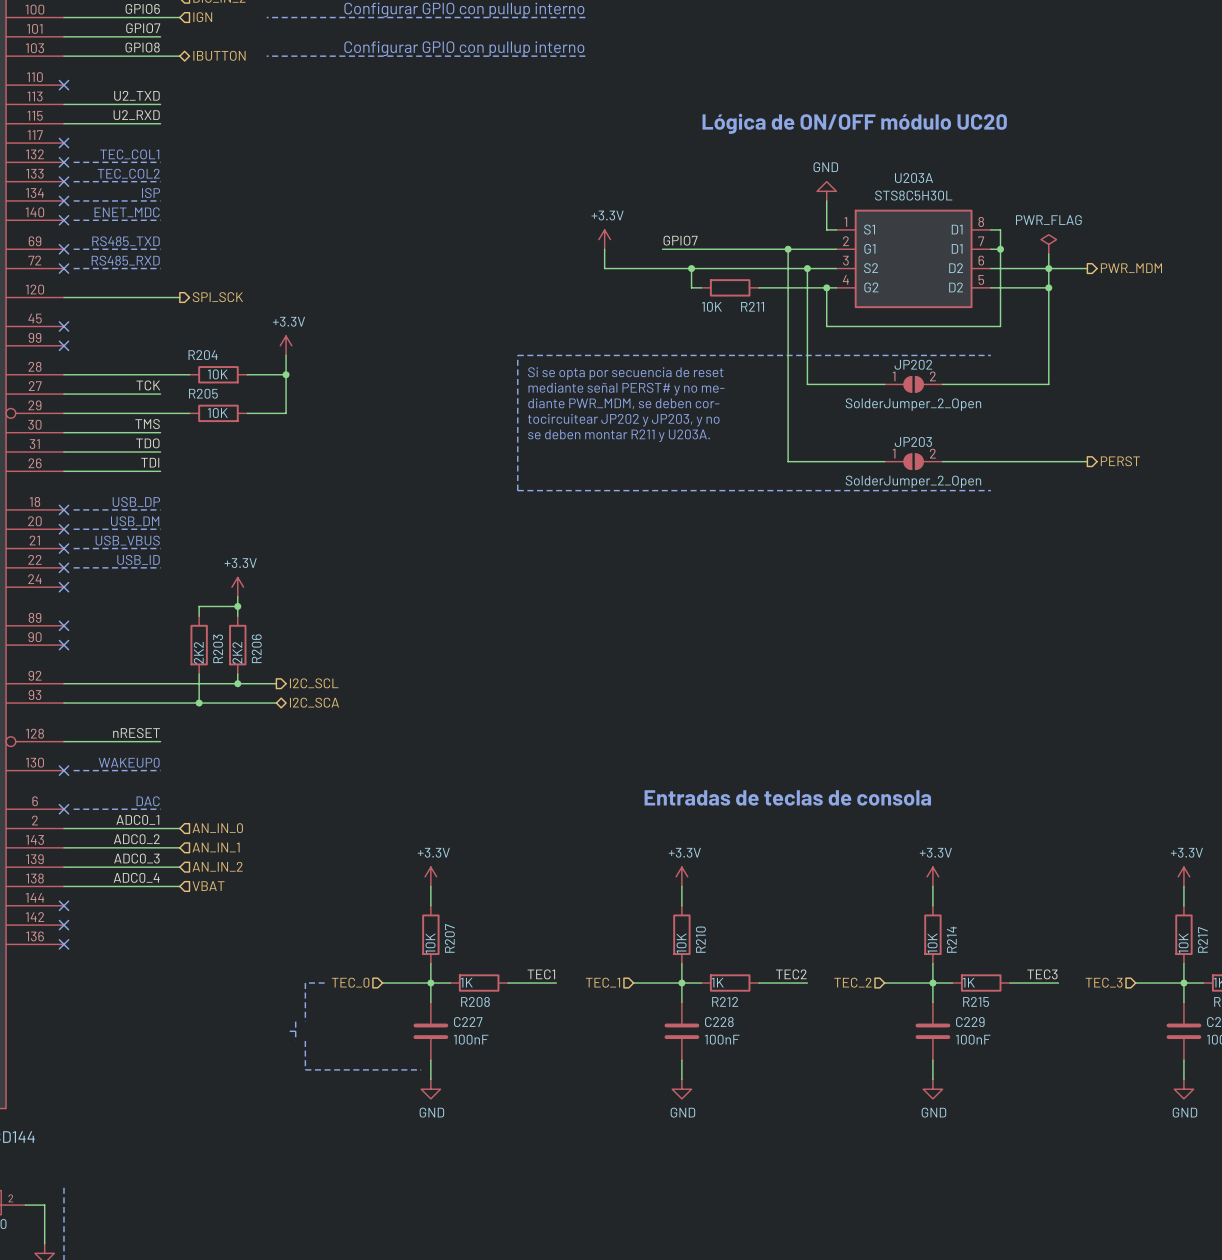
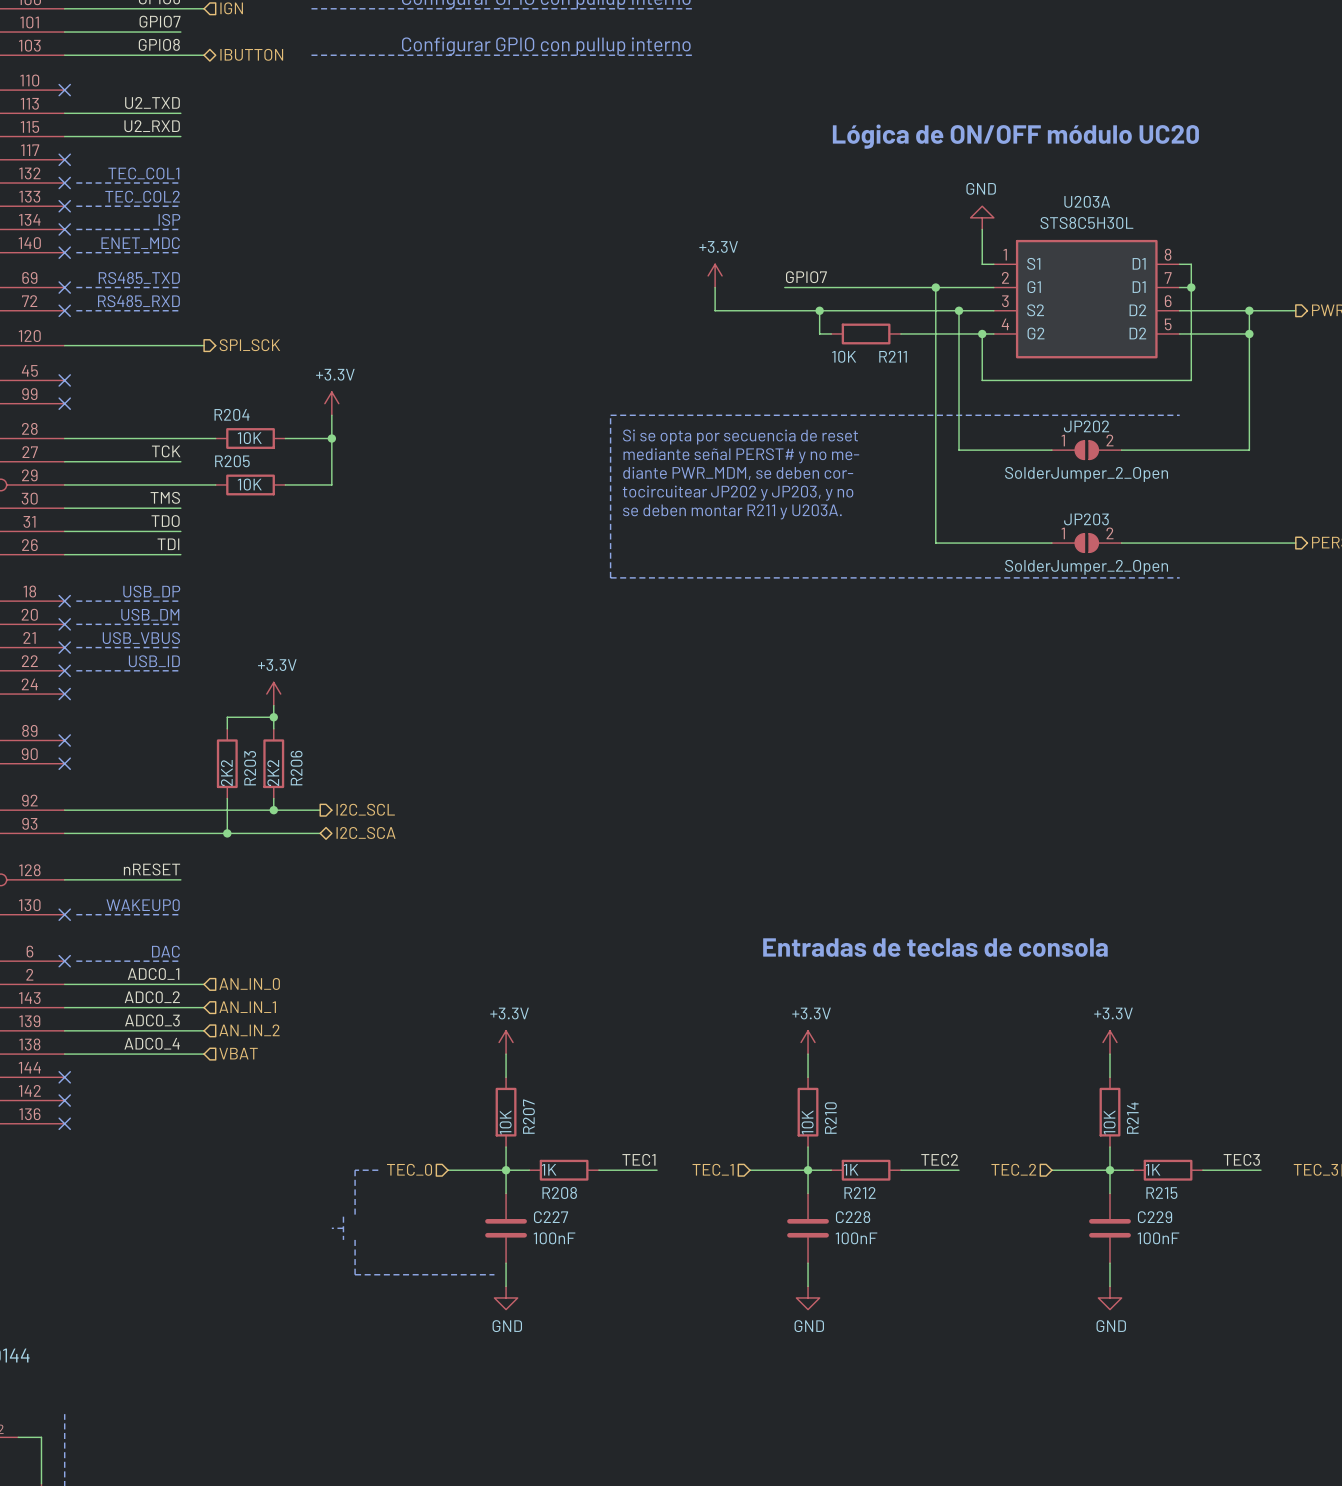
power symbol: PWR_FLAG (1048, 244) -> none
wire: (1048, 254) (1048, 268) -> none

